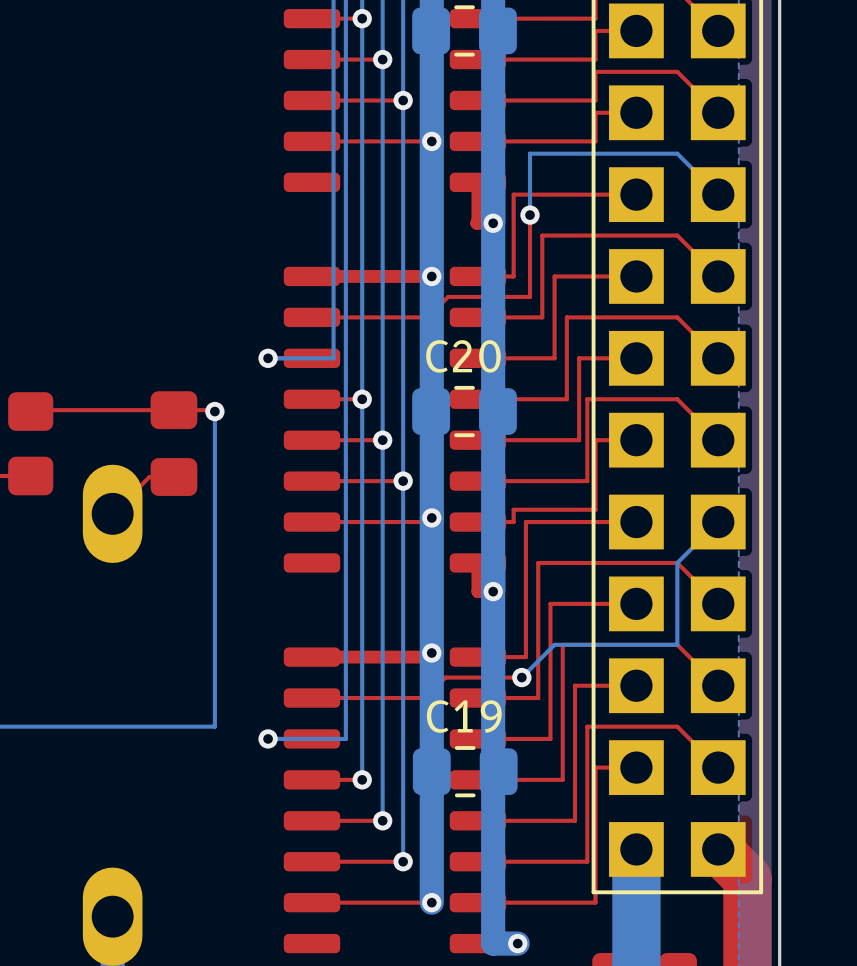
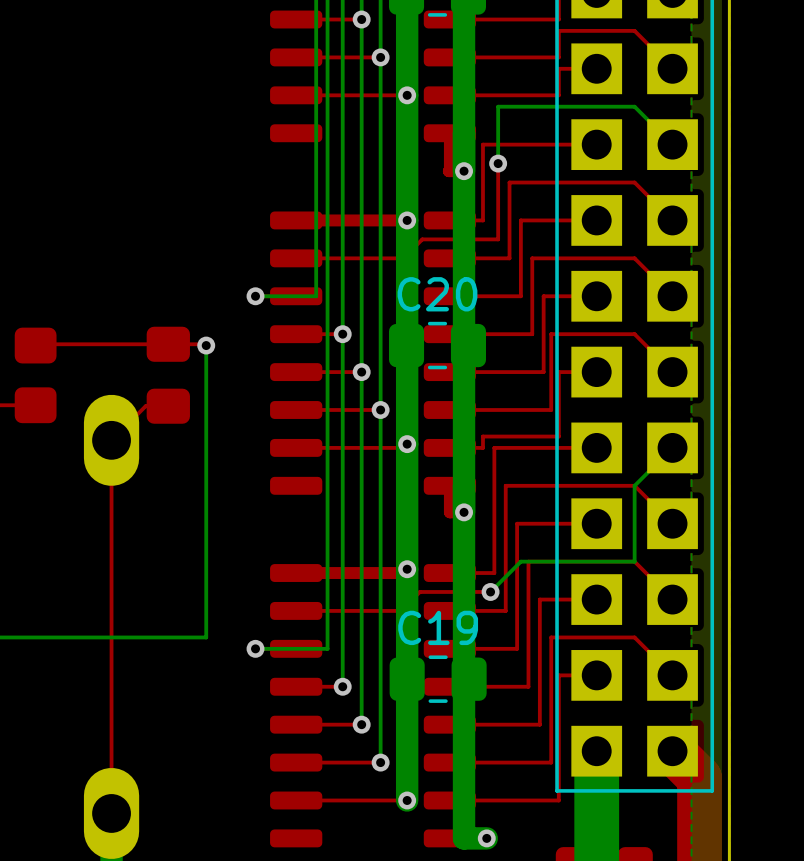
top track: none -> (111, 440) (111, 813)

